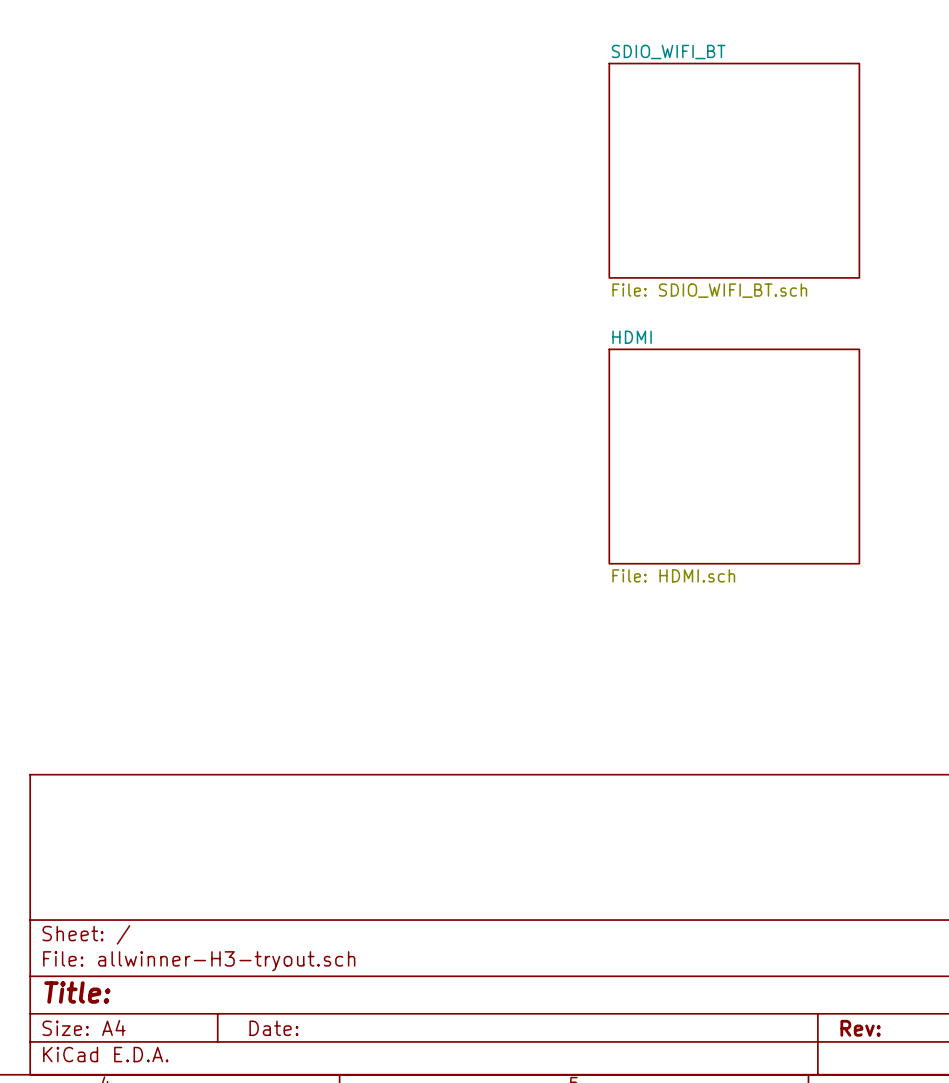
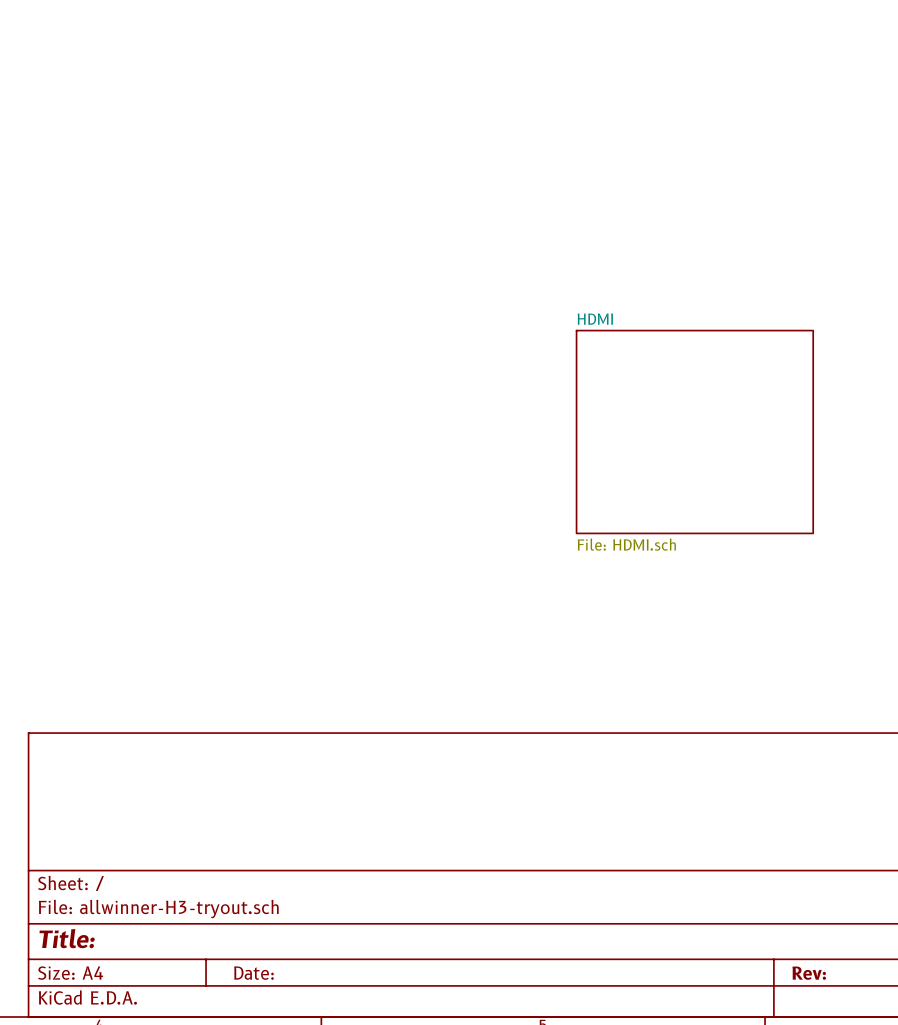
sheet SDIO_WIFI_BT: File: SDIO_WIFI_BT.sch (734, 170) -> none

